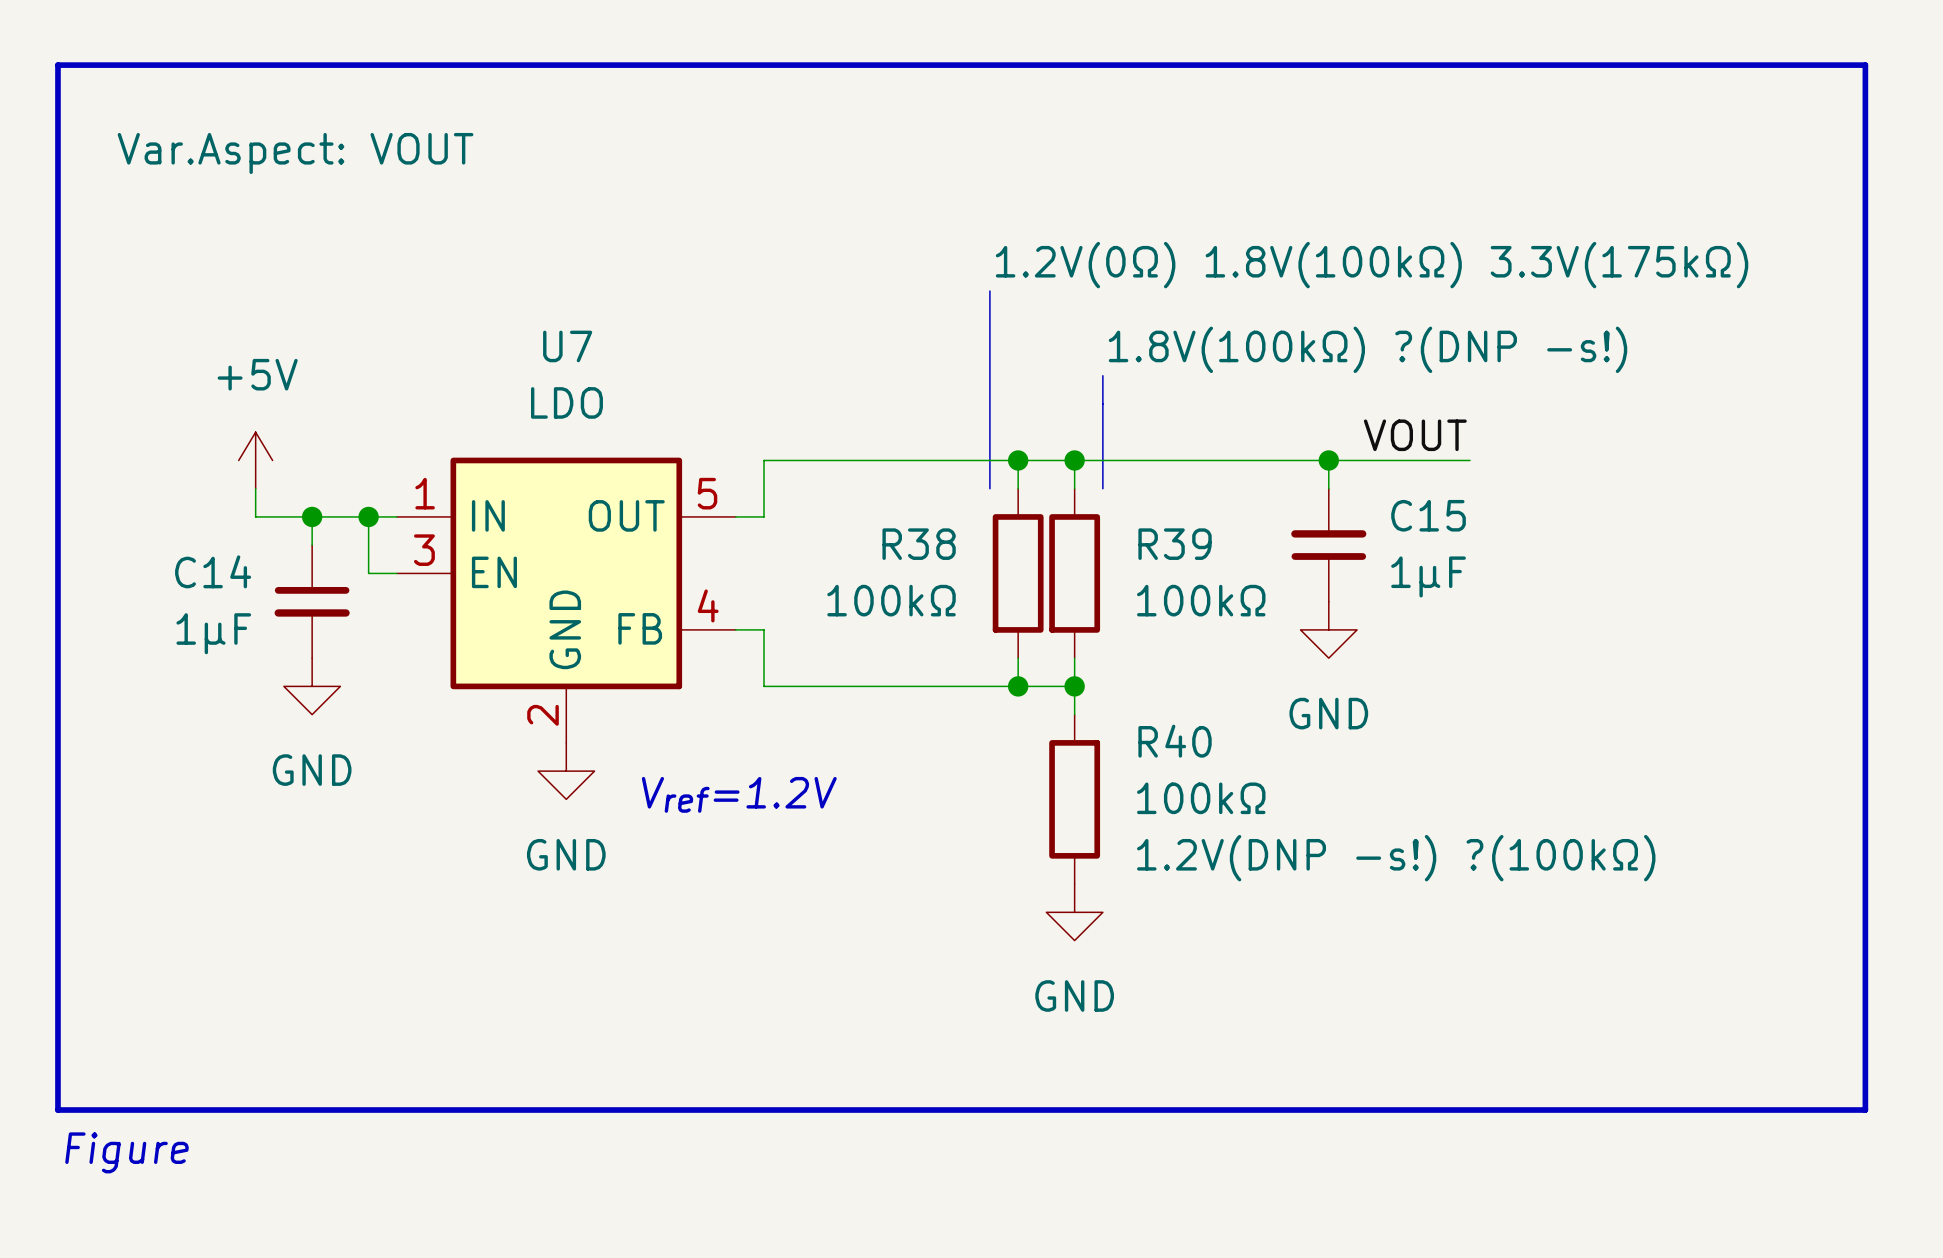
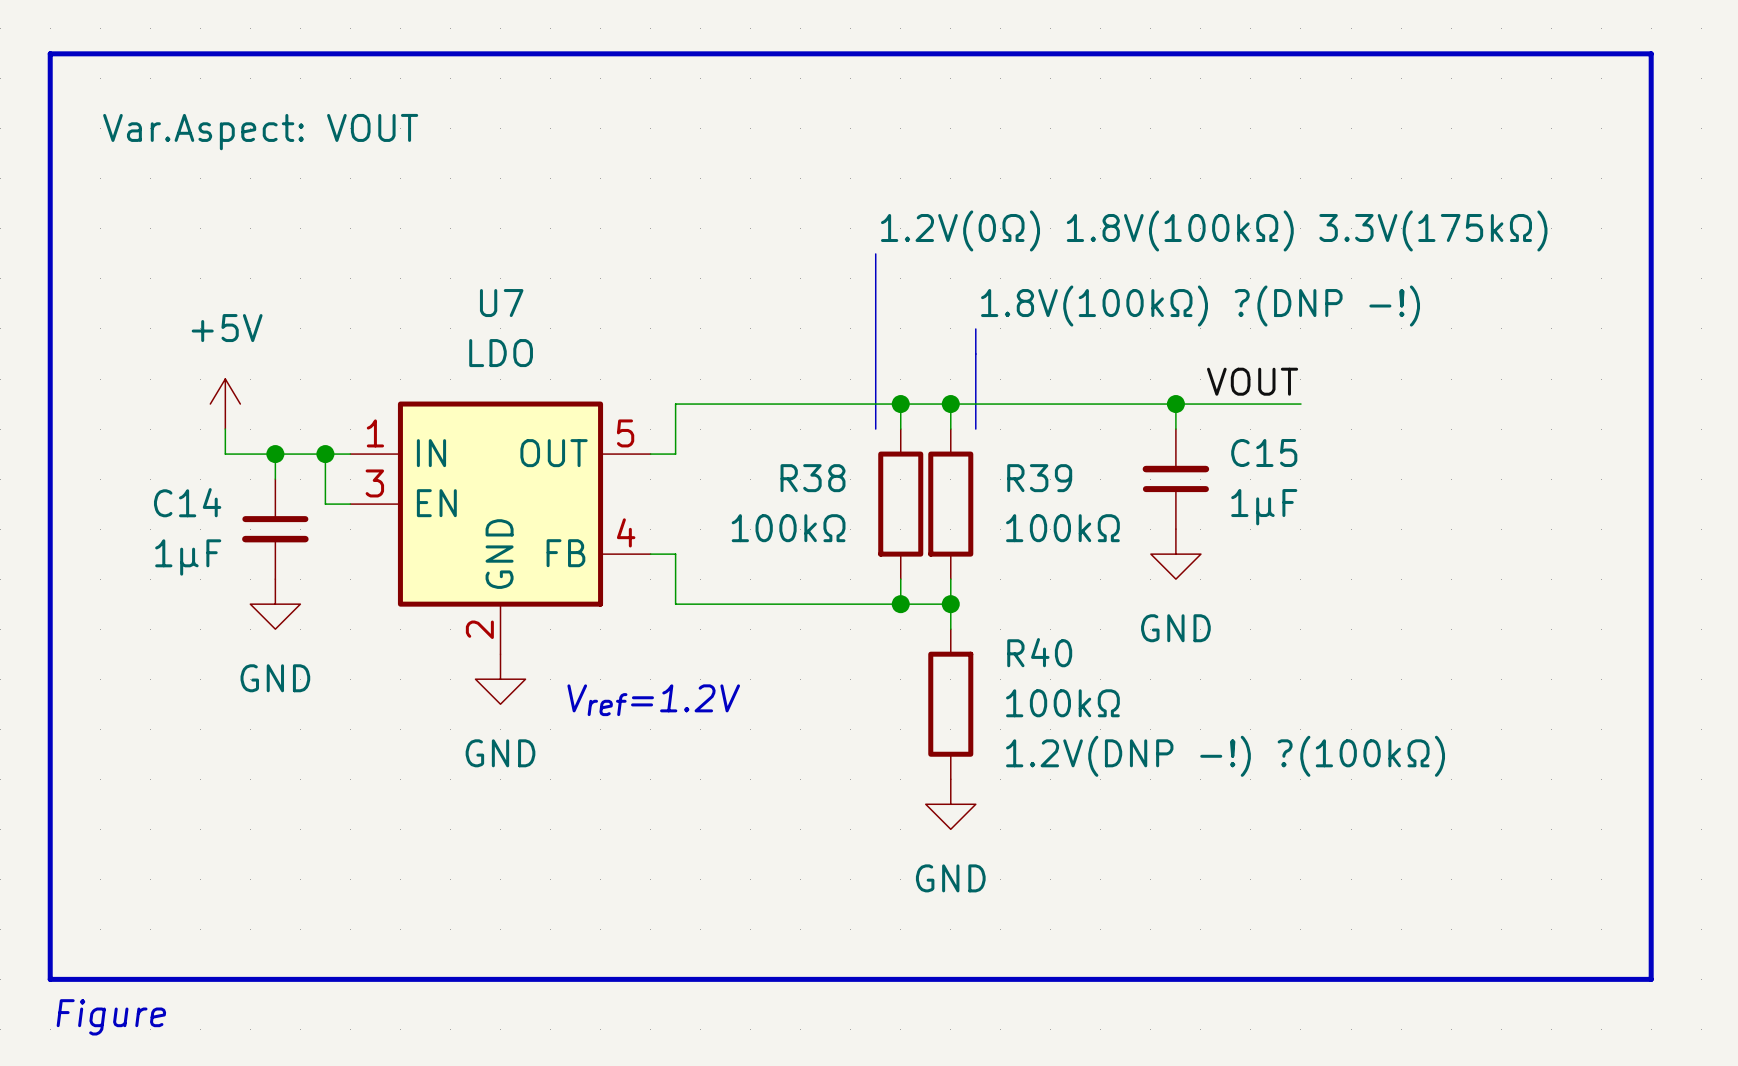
R39 text: 1.8V(100kΩ) ?(DNP -s!) (1368, 349) -> 1.8V(100kΩ) ?(DNP -!) (1200, 306)
R40 text: 1.2V(DNP -s!) ?(100kΩ) (1396, 858) -> 1.2V(DNP -!) ?(100kΩ) (1225, 756)

